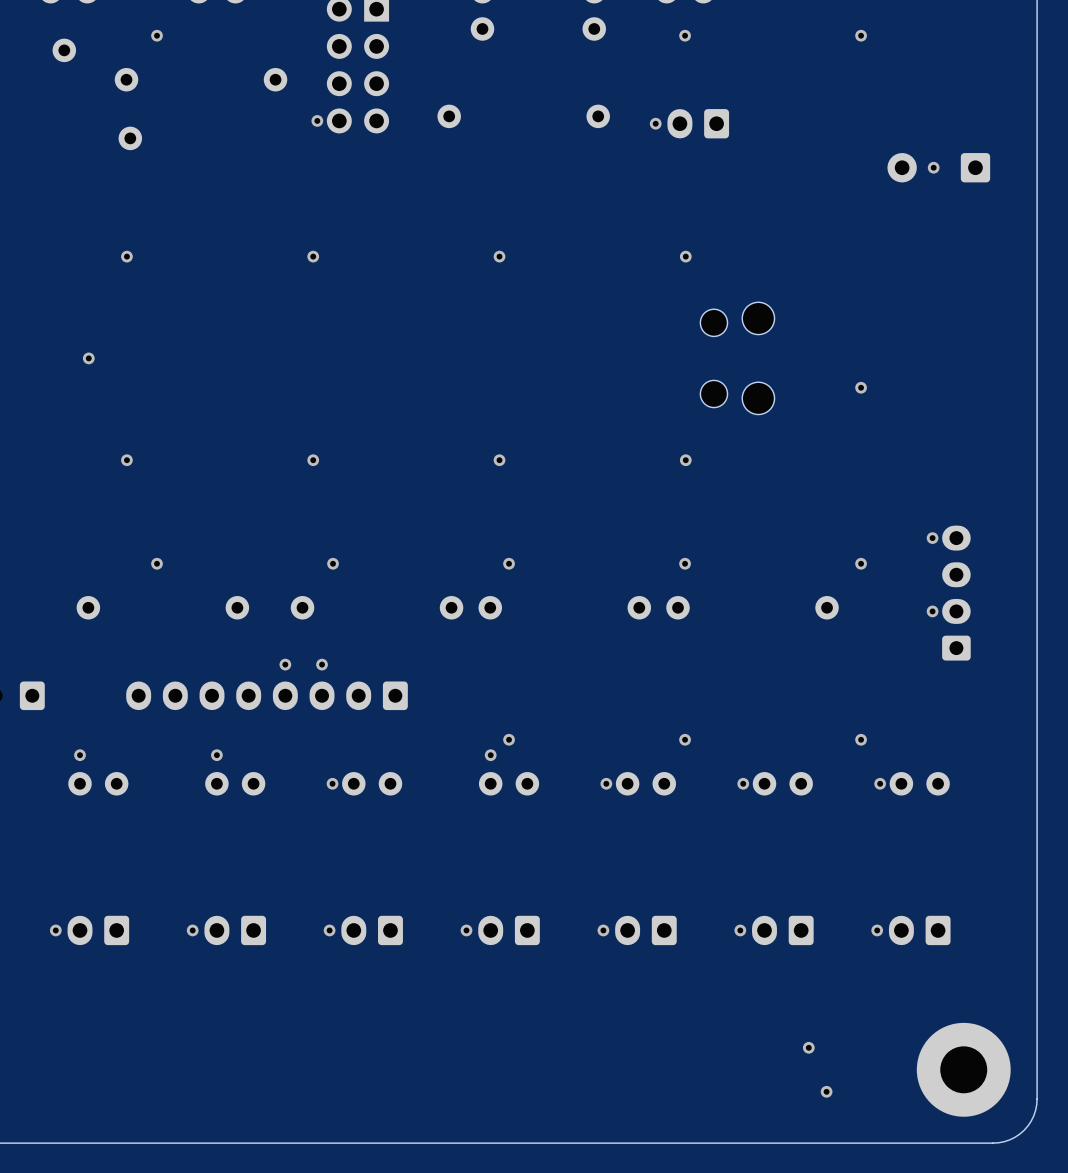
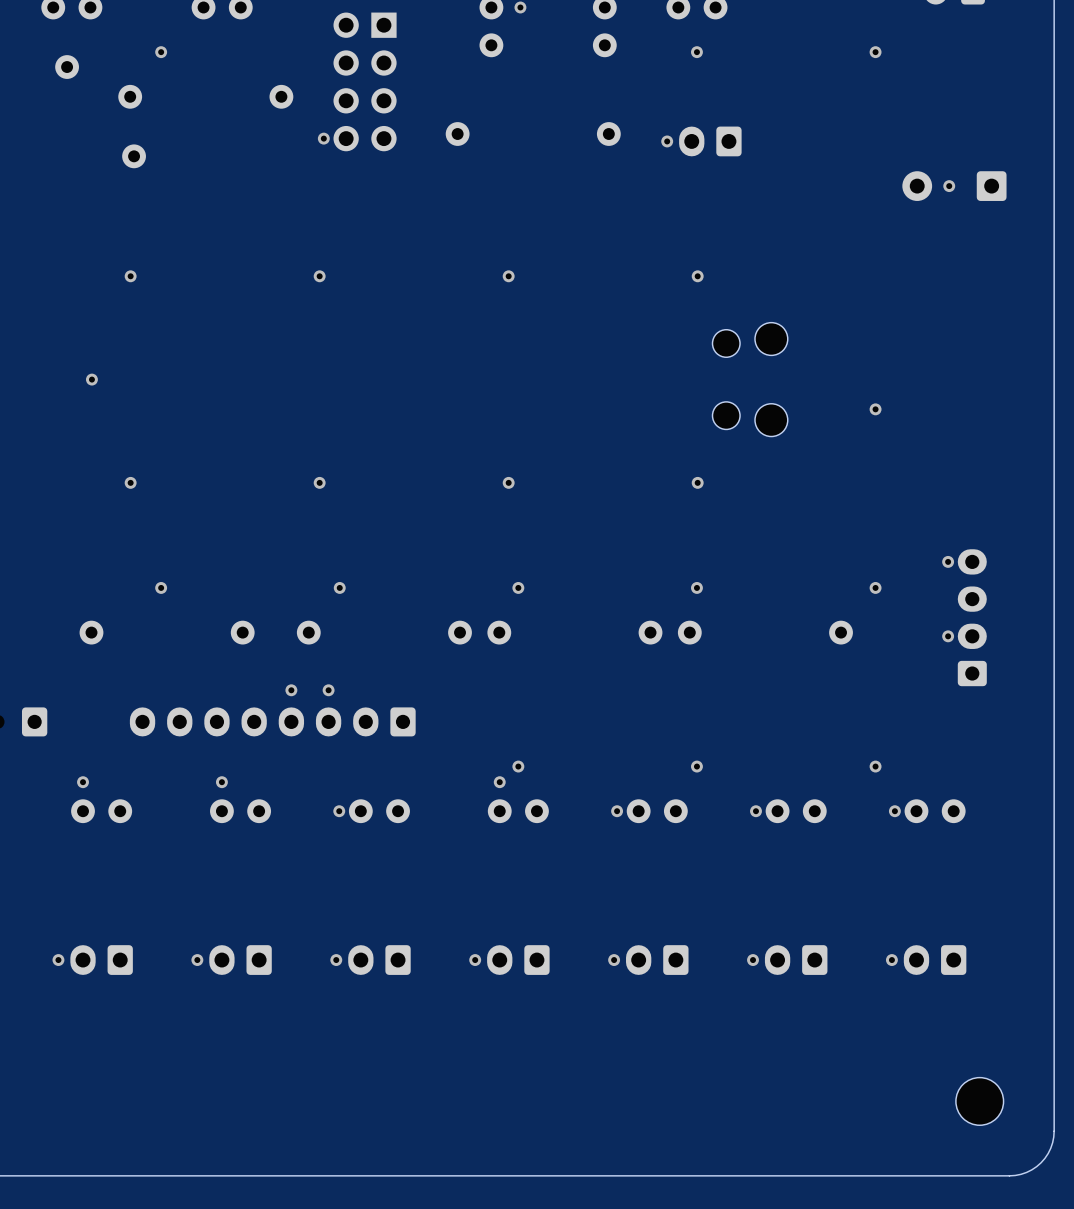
part footprint: [916, 1022, 1011, 1117] -> [955, 1077, 1004, 1126]
via: (808, 1047) -> none
via: (826, 1091) -> none

